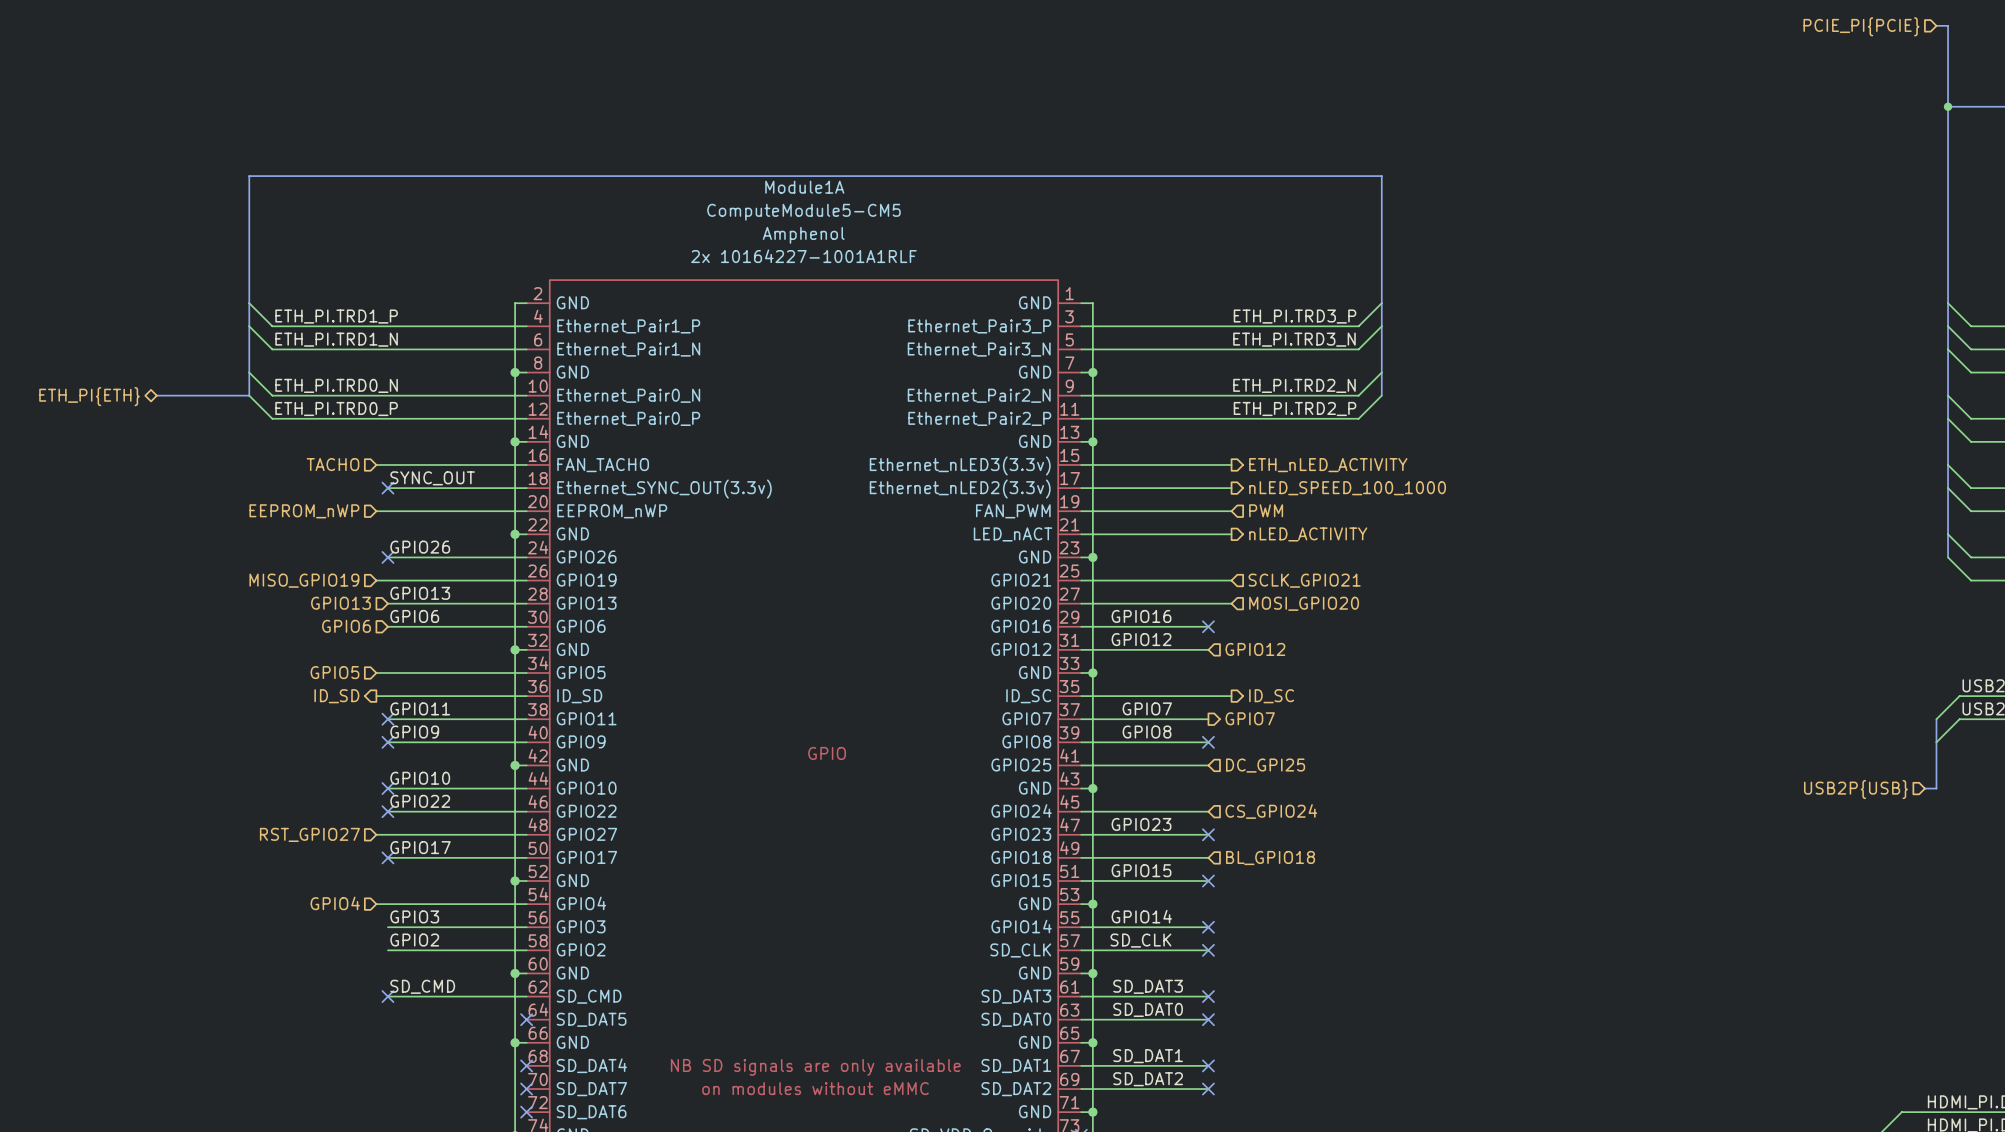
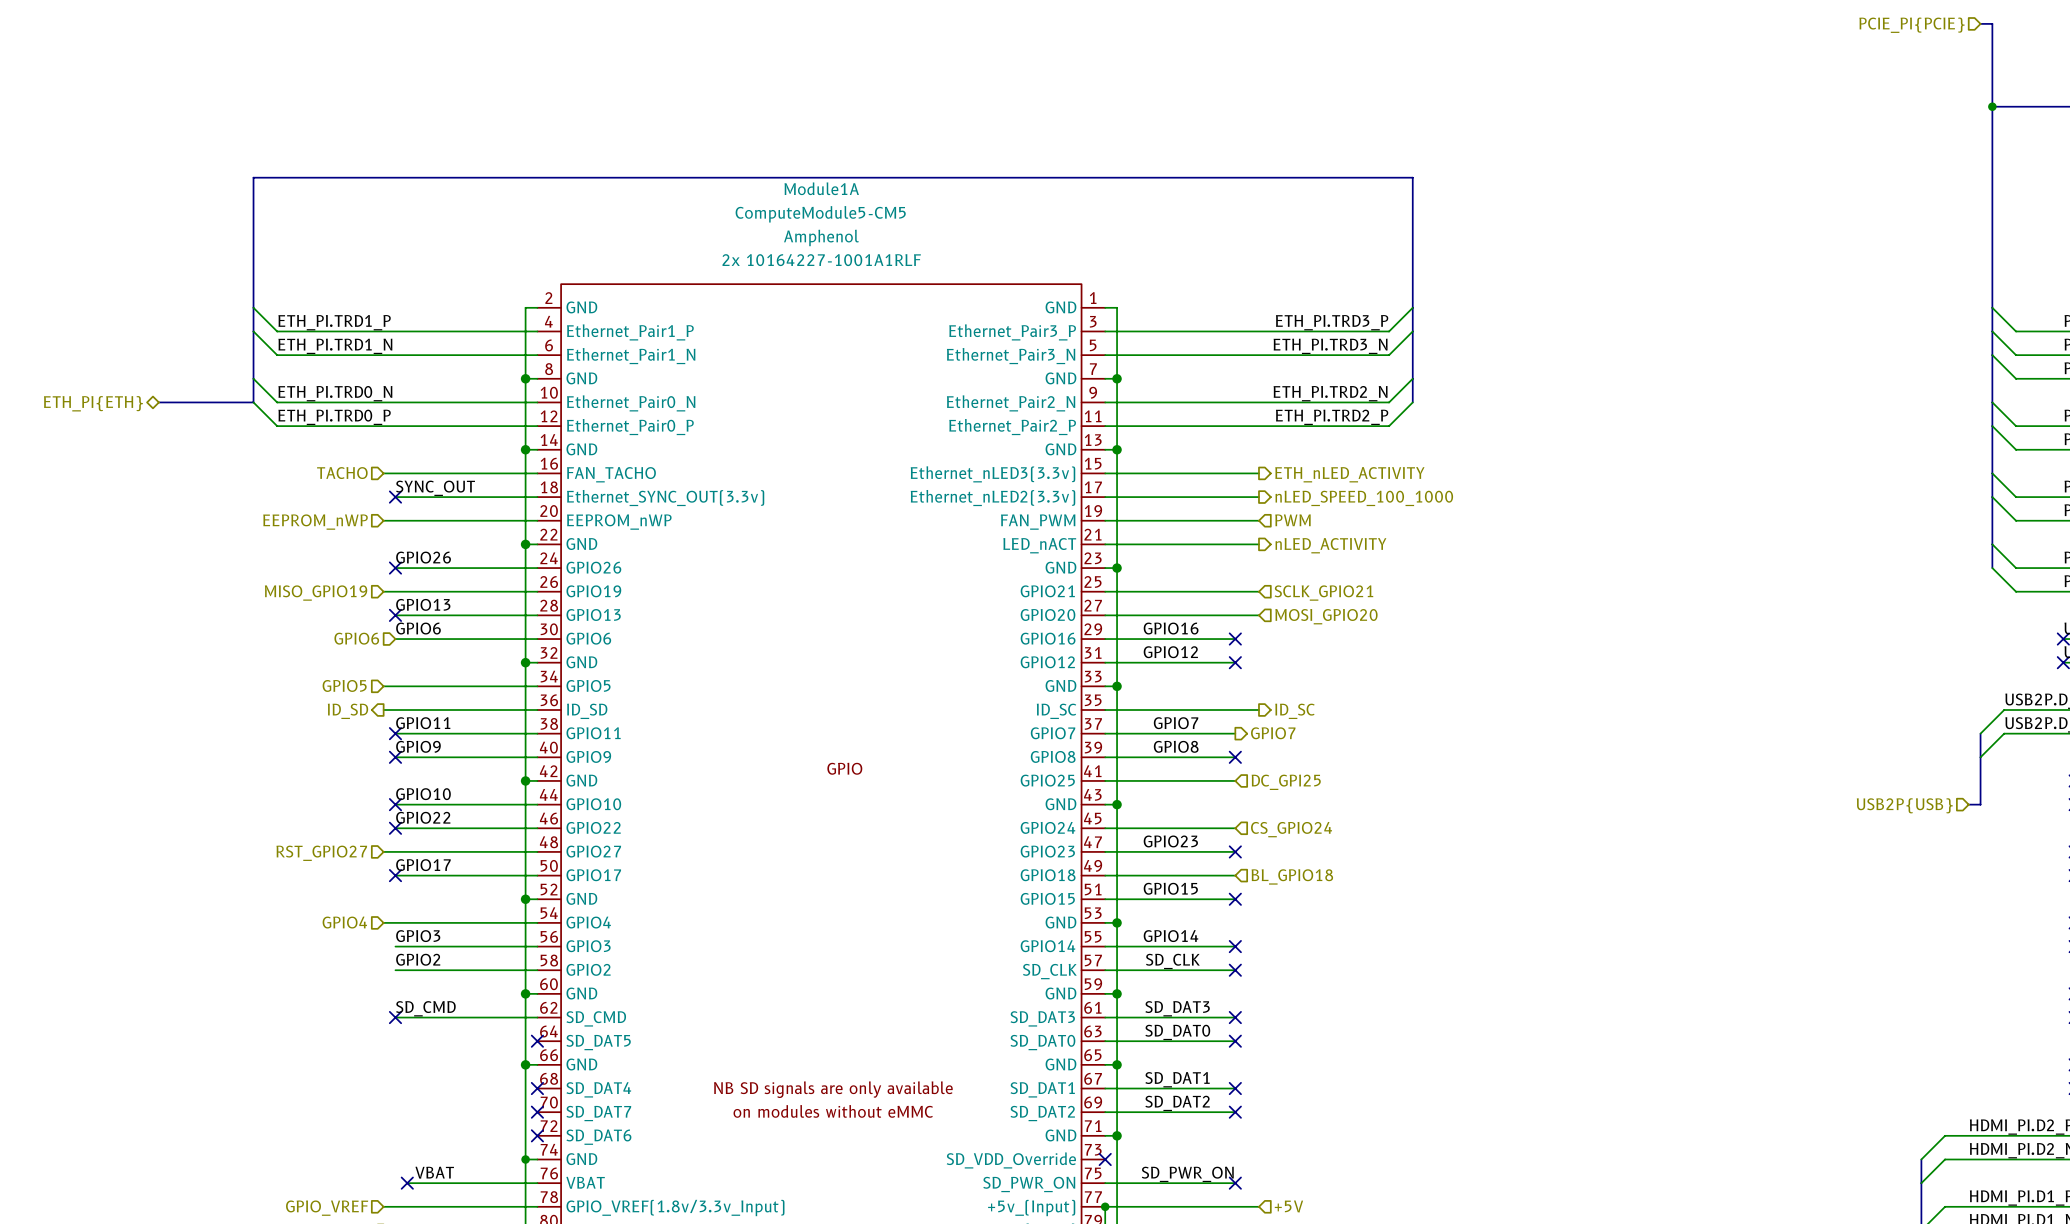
hierarchical label: GPIO13 (341, 603) -> none
no-connect mark: none -> (395, 615)
no-connect mark: none -> (1235, 662)
hierarchical label: GPIO12 (1255, 649) -> none

